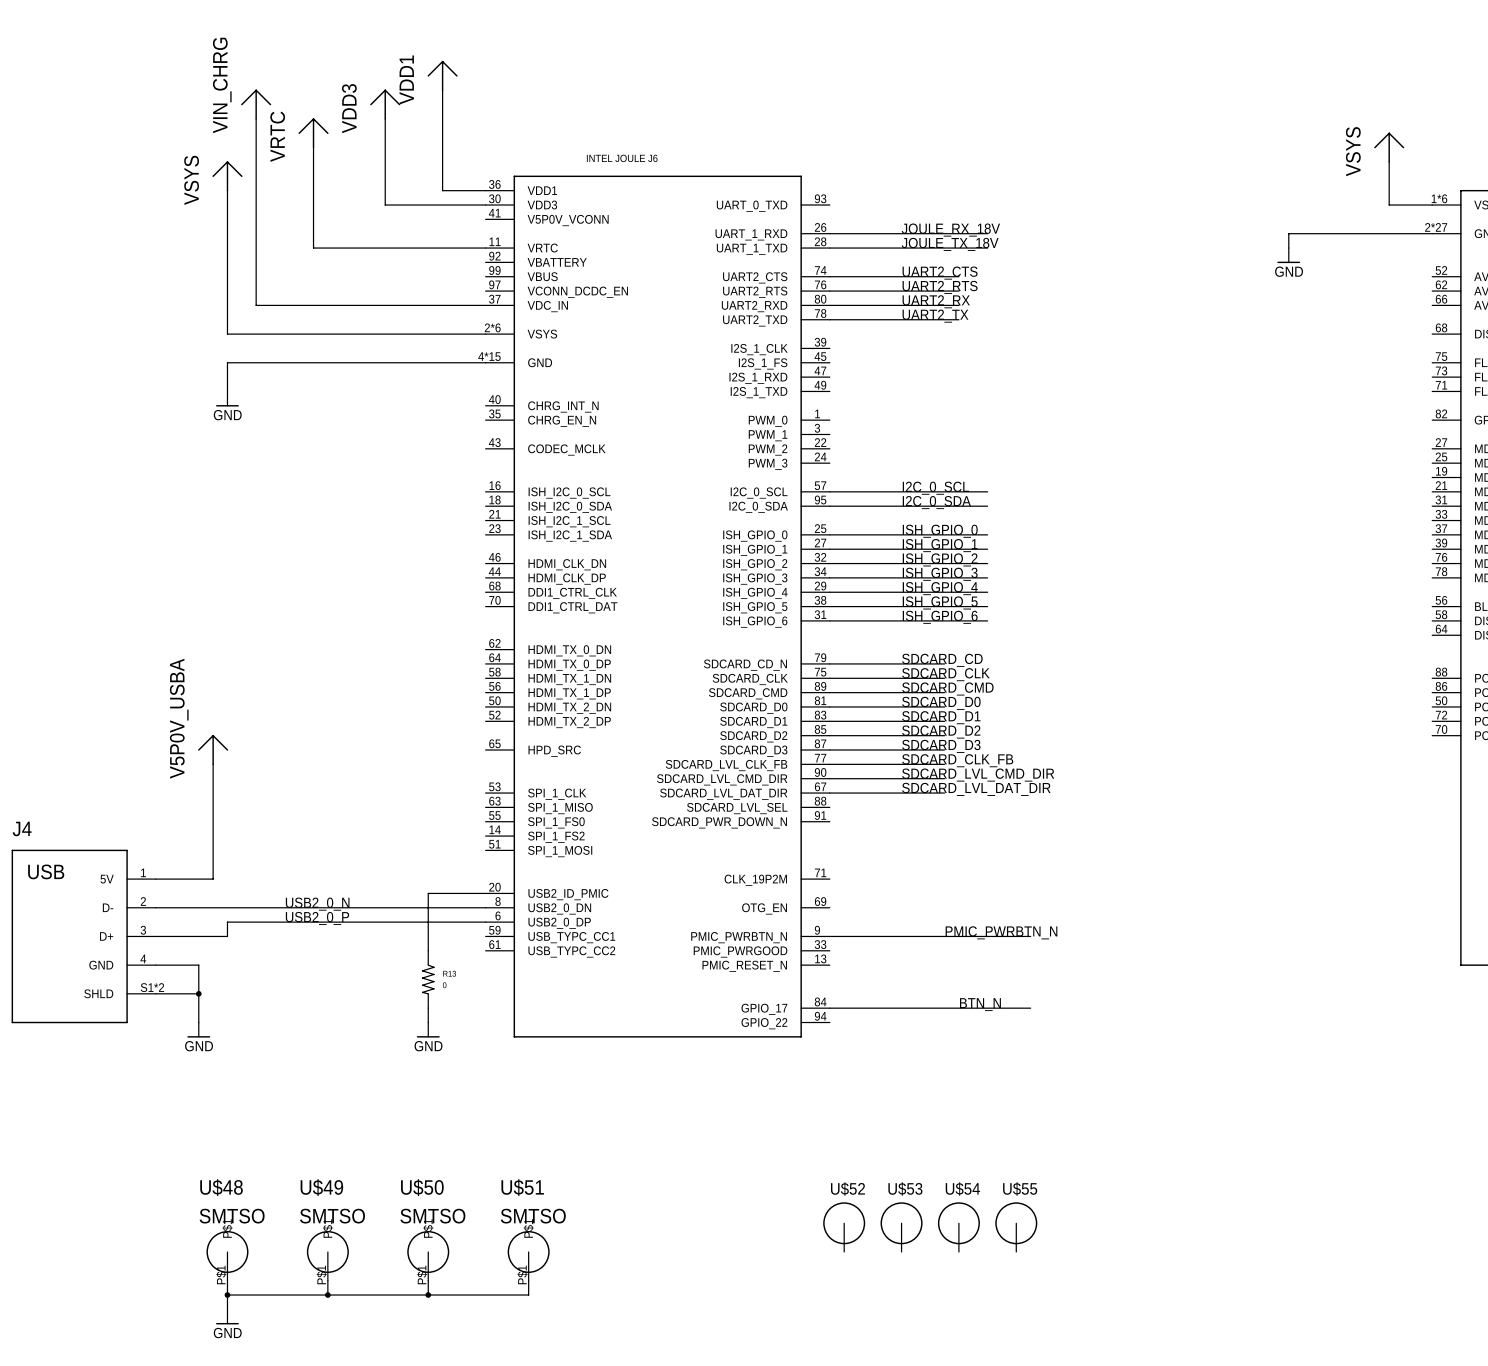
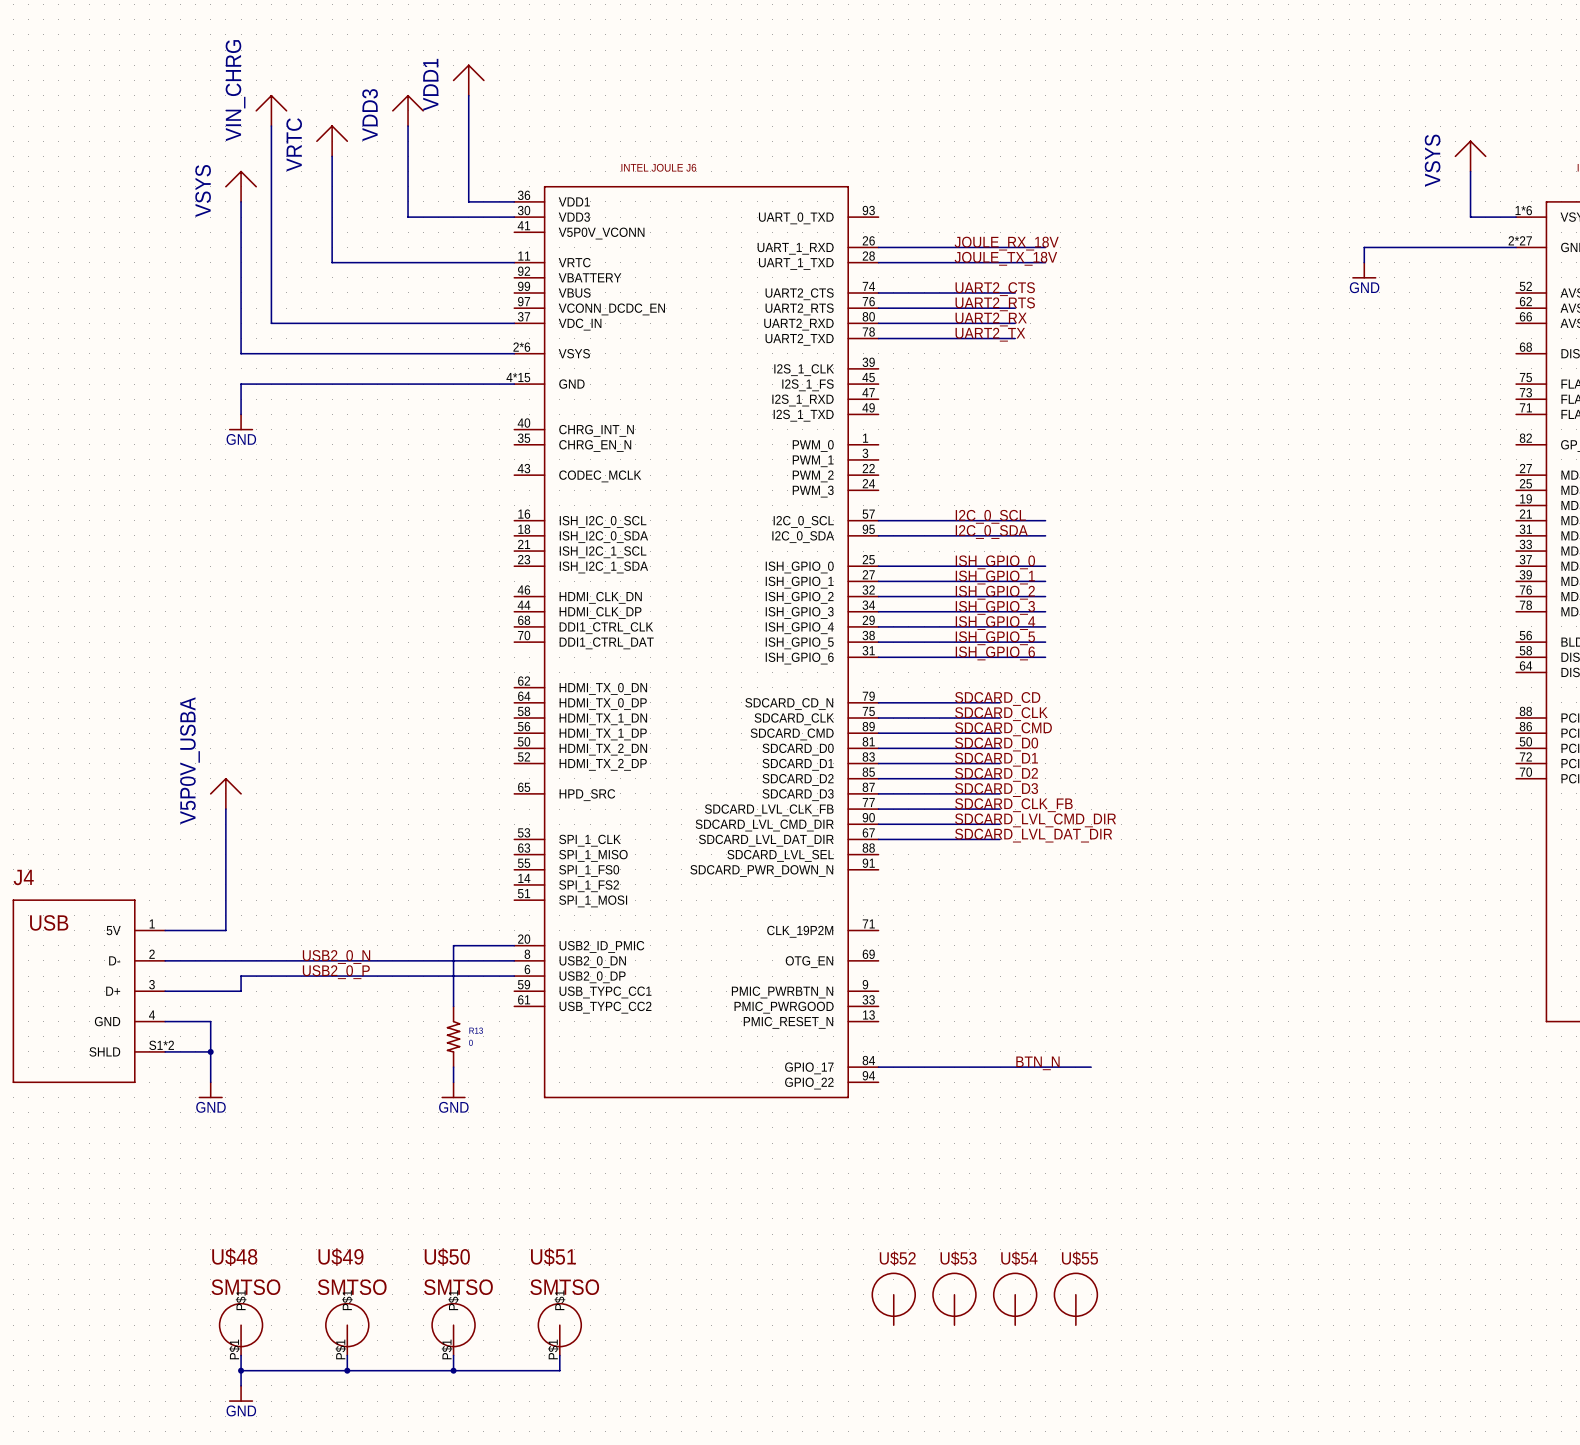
label: PMIC_PWRBTN_N (1001, 932) -> none
wire: (829, 936) (1030, 936) -> none

